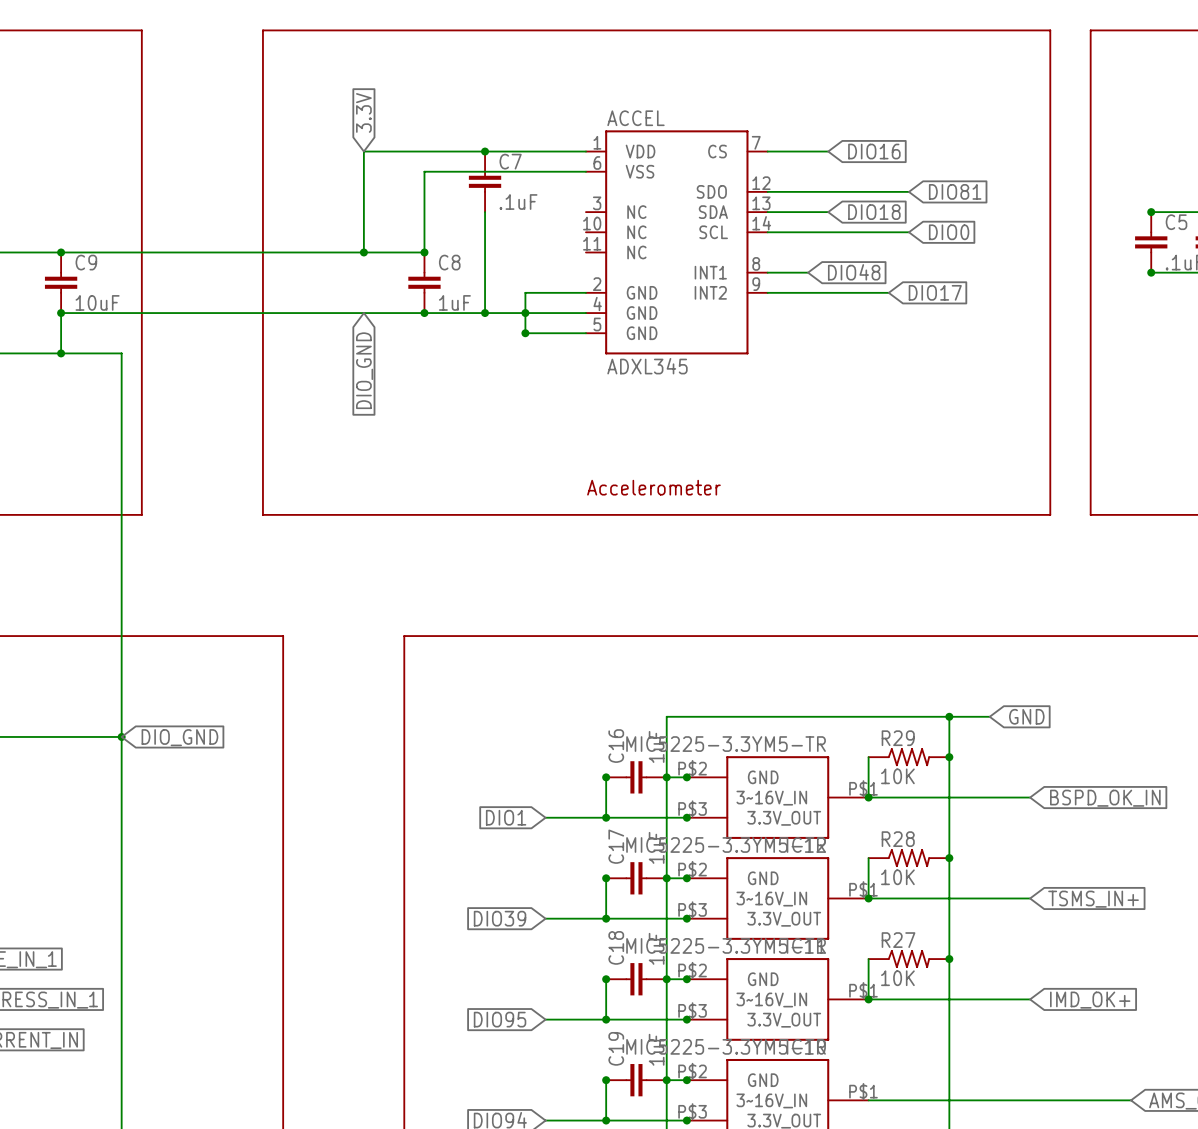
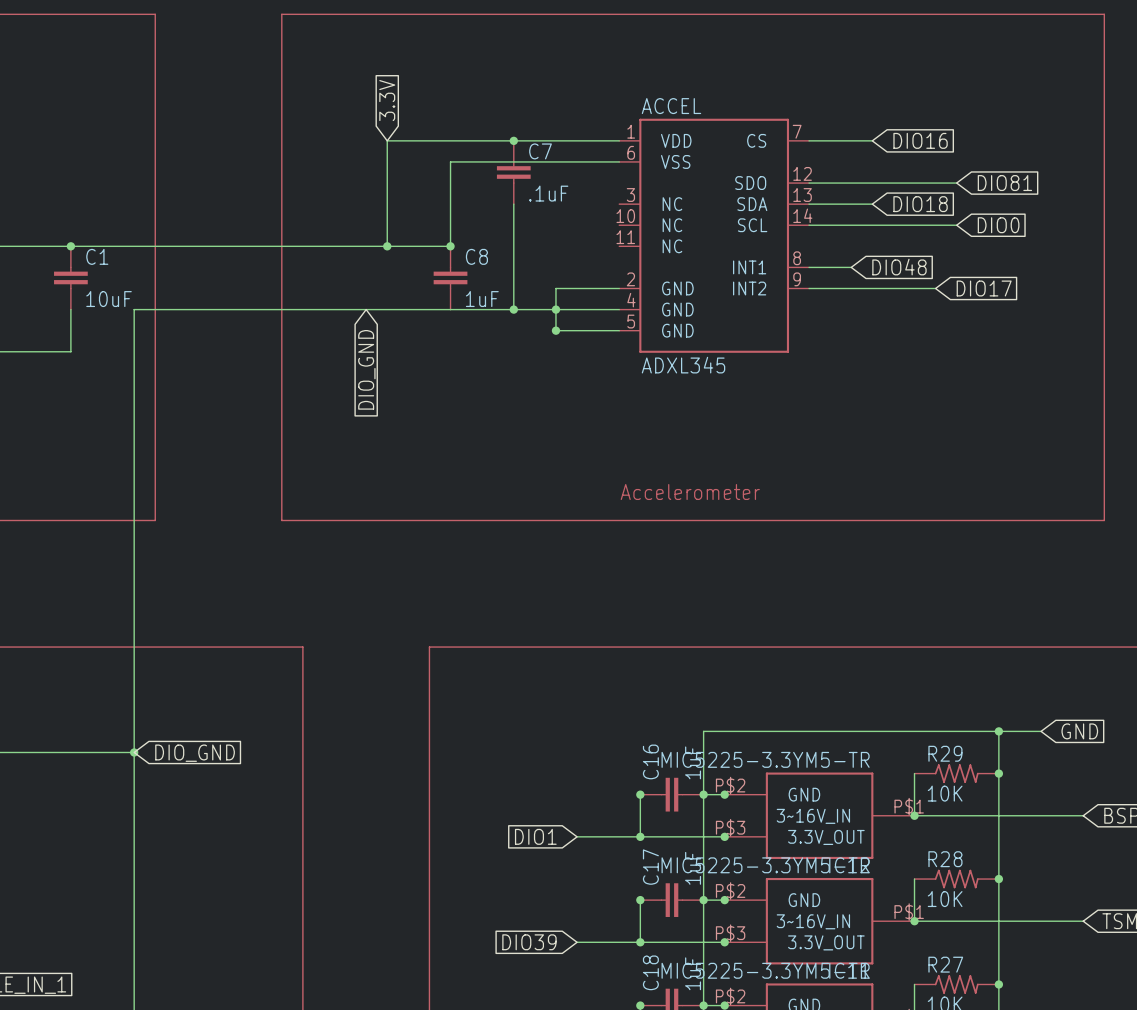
C9 name: C9 (86, 262) -> C1 (97, 256)
wire: (61, 313) (121, 313) -> (134, 351) (134, 309)
junction: (61, 313) -> none
junction: (424, 313) -> none
wire: (61, 353) (121, 353) -> none
junction: (61, 353) -> none
global label position: DIO_GND (364, 370) -> DIO_GND (366, 369)

